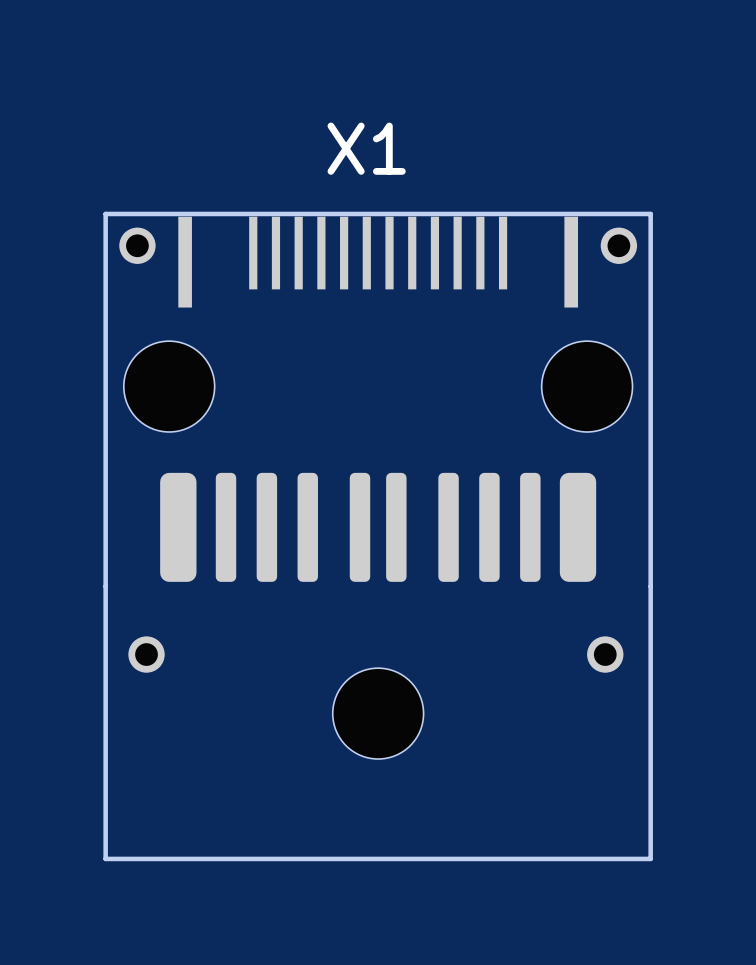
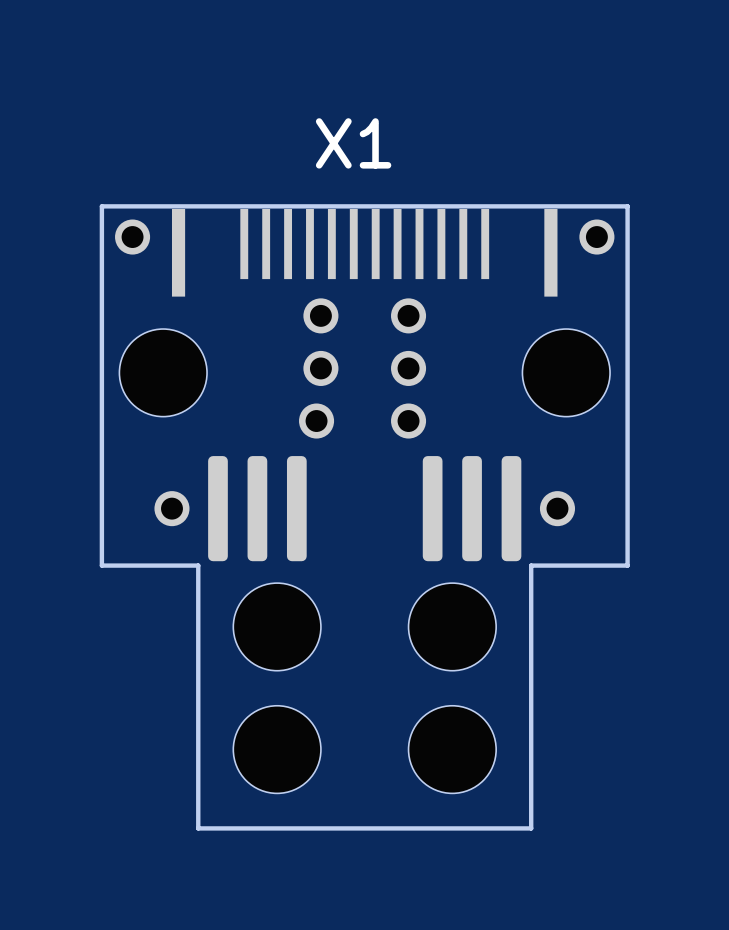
part: none -> (320, 315)
part: none -> (408, 315)
part: none -> (320, 368)
part: none -> (408, 368)
part: none -> (316, 421)
part: none -> (408, 421)
part footprint: [160, 472, 197, 582] -> [154, 491, 190, 527]
part footprint: [559, 472, 597, 582] -> [539, 491, 576, 527]
part: (359, 527) -> none
part: (396, 527) -> none
board edge: (105, 586) (105, 858) (205, 858) -> (101, 565) (198, 565) (198, 828)
board edge: (650, 586) (650, 858) (550, 858) -> (627, 565) (531, 565) (531, 828)
part: none -> (277, 626)
part: none -> (452, 626)
part: (146, 654) -> none
part: (605, 654) -> none
part: (378, 713) -> none
part: none -> (277, 749)
part: none -> (452, 749)

